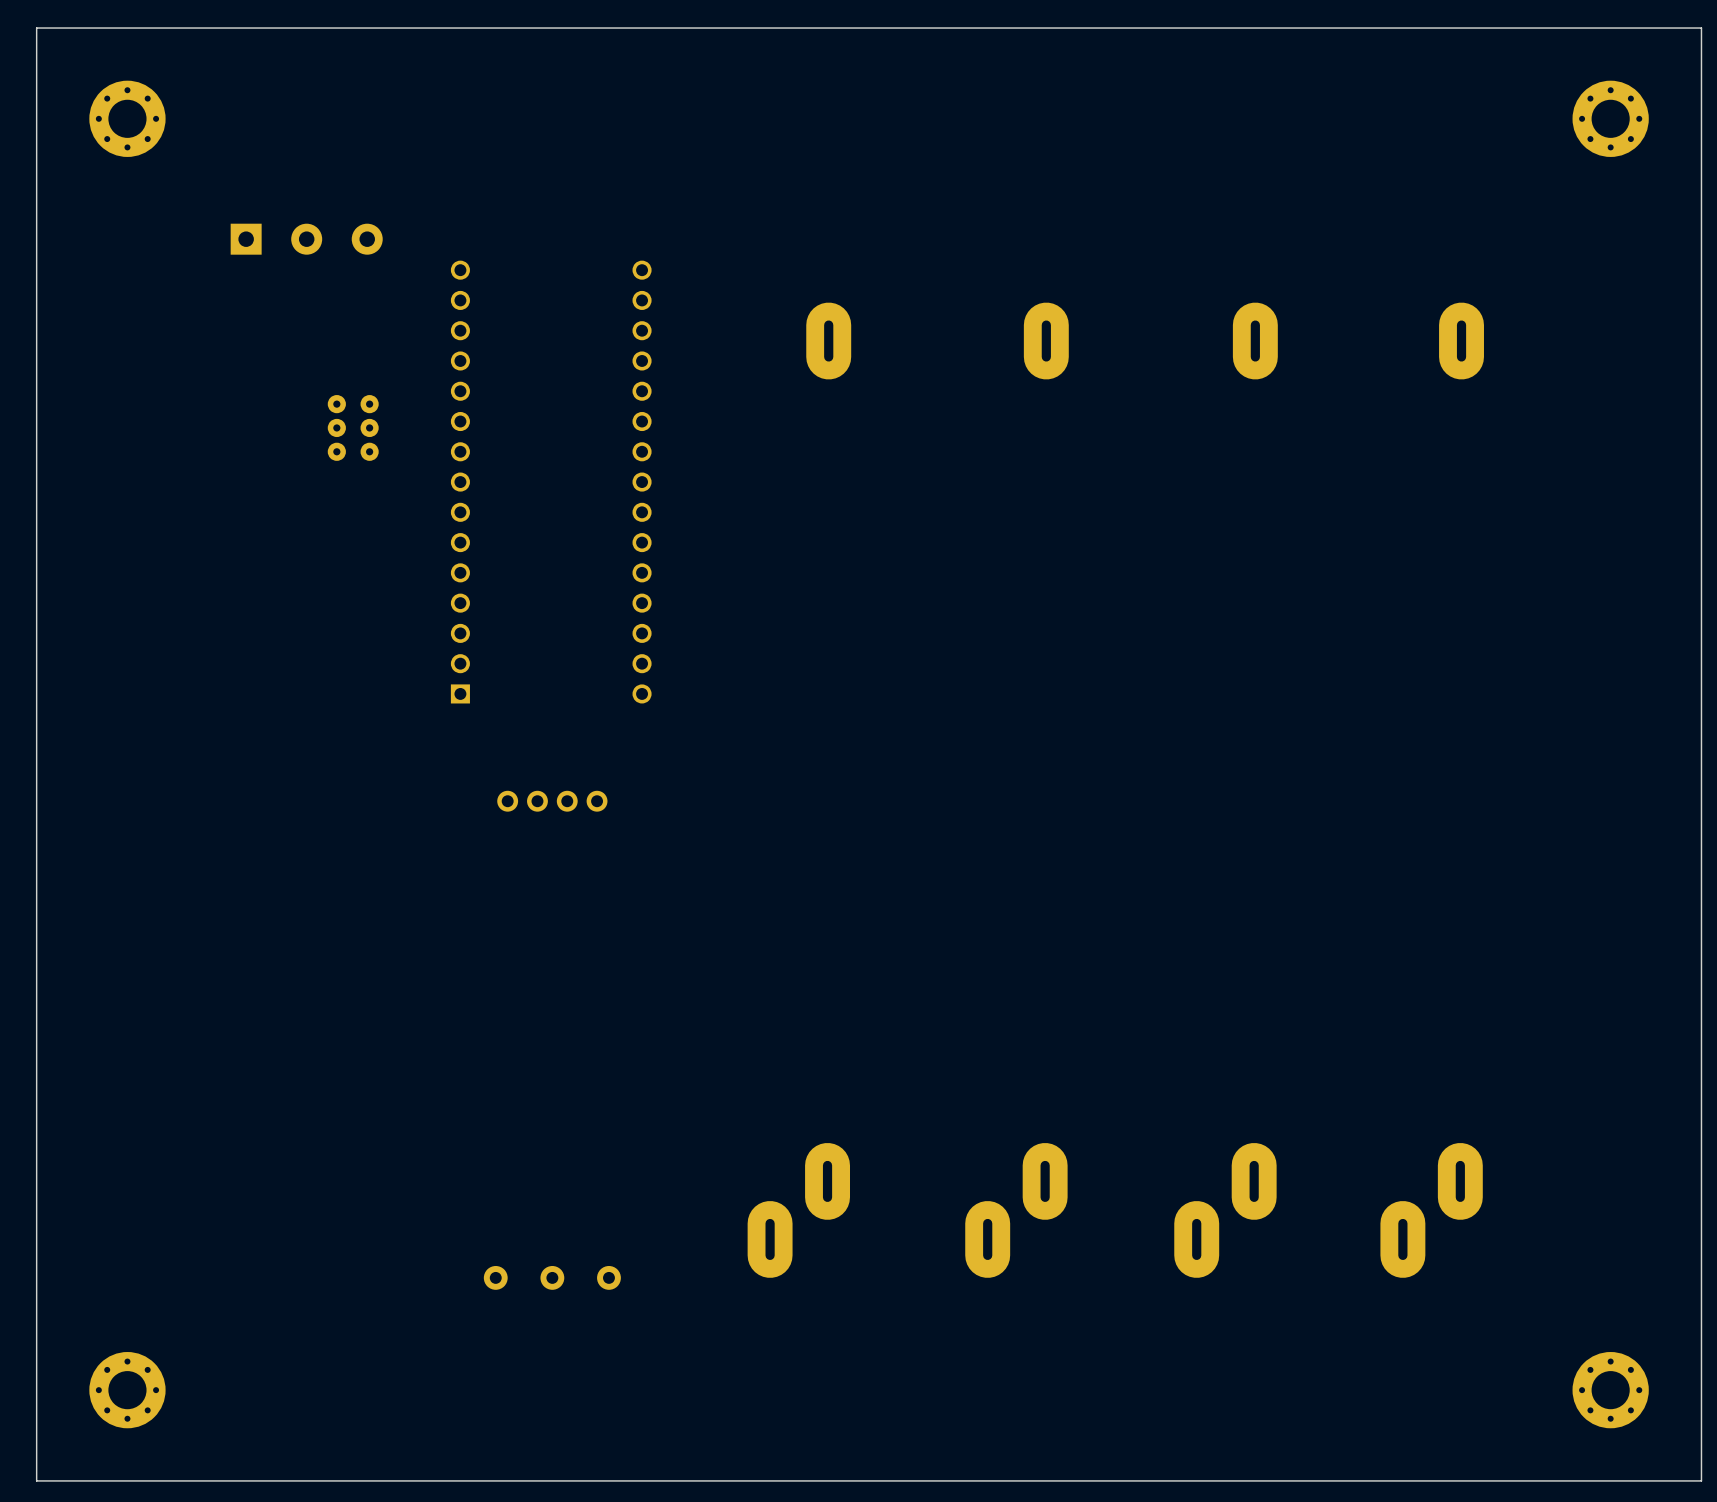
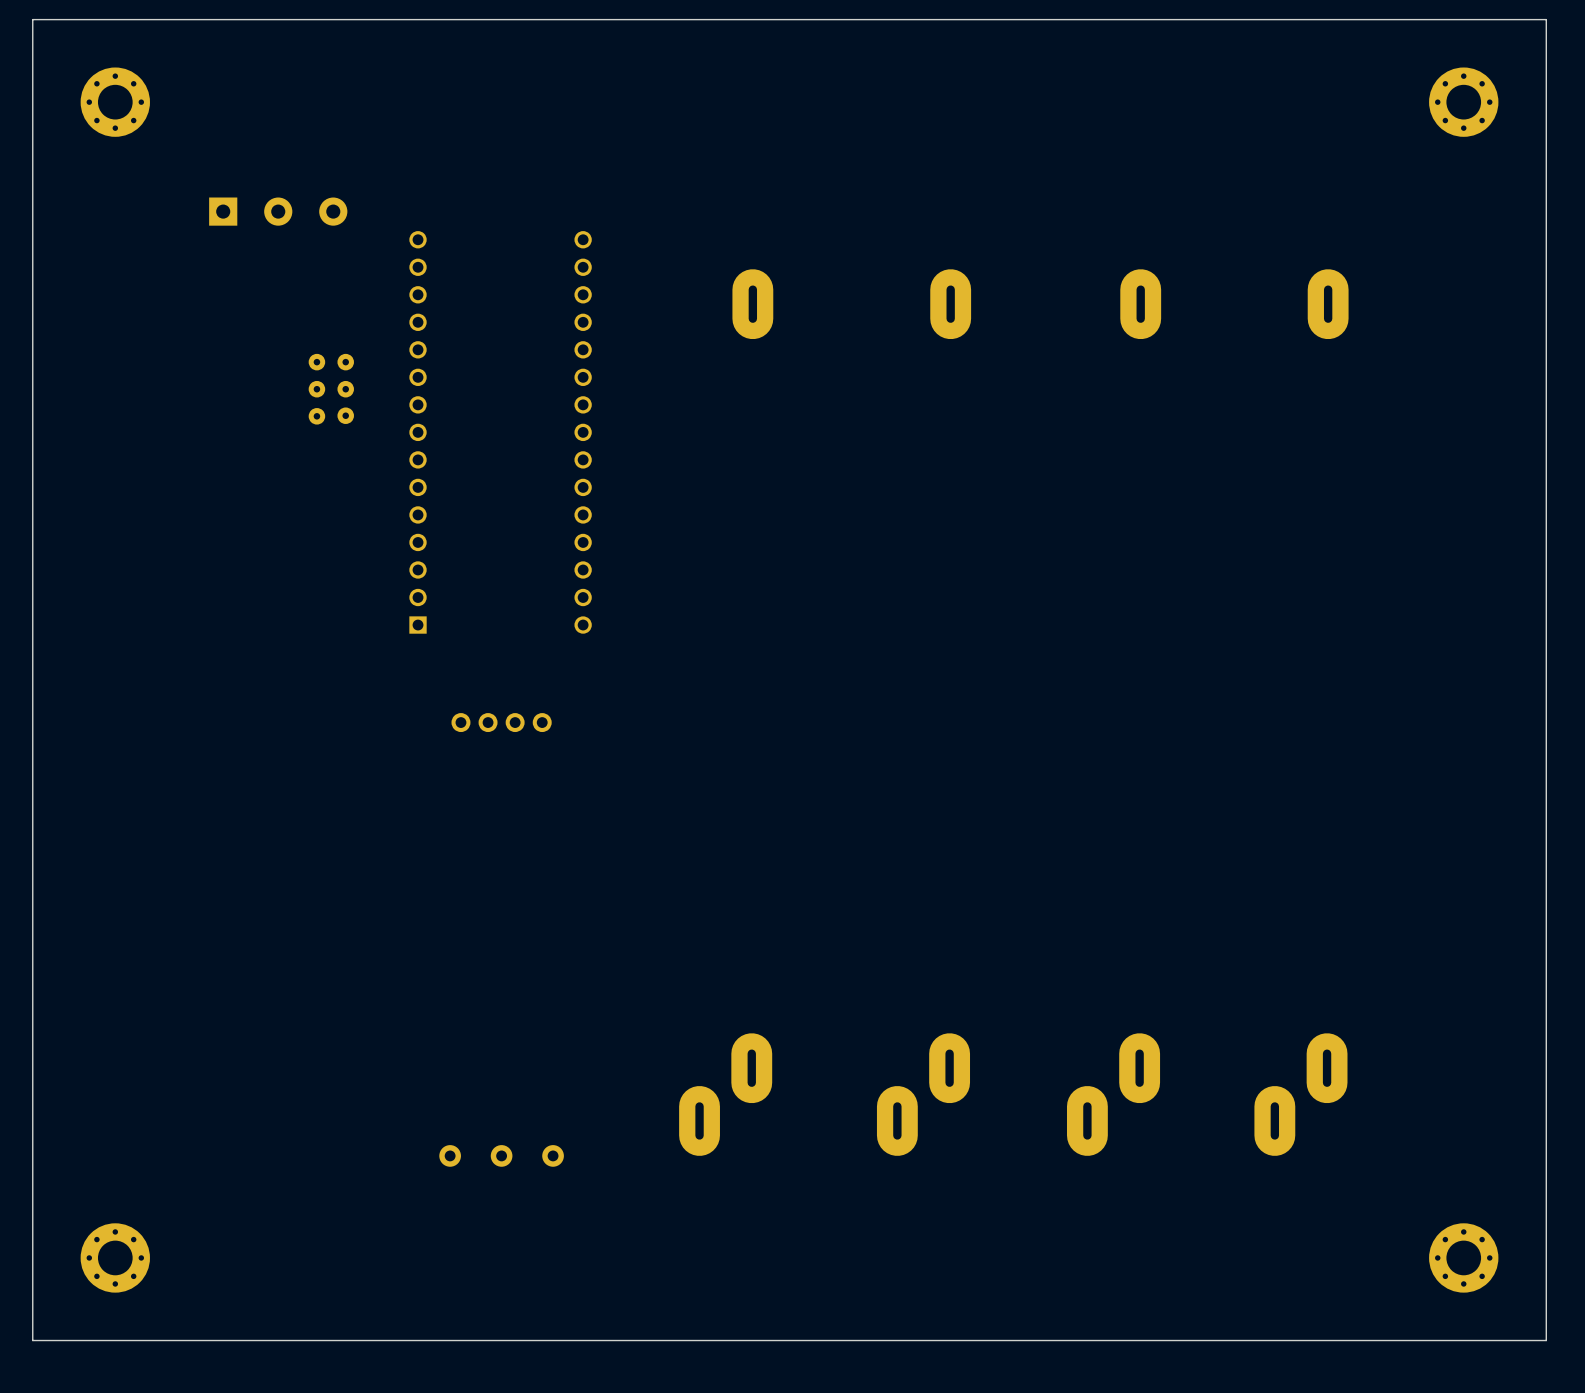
part: (353, 427) -> none
part: none -> (331, 389)

